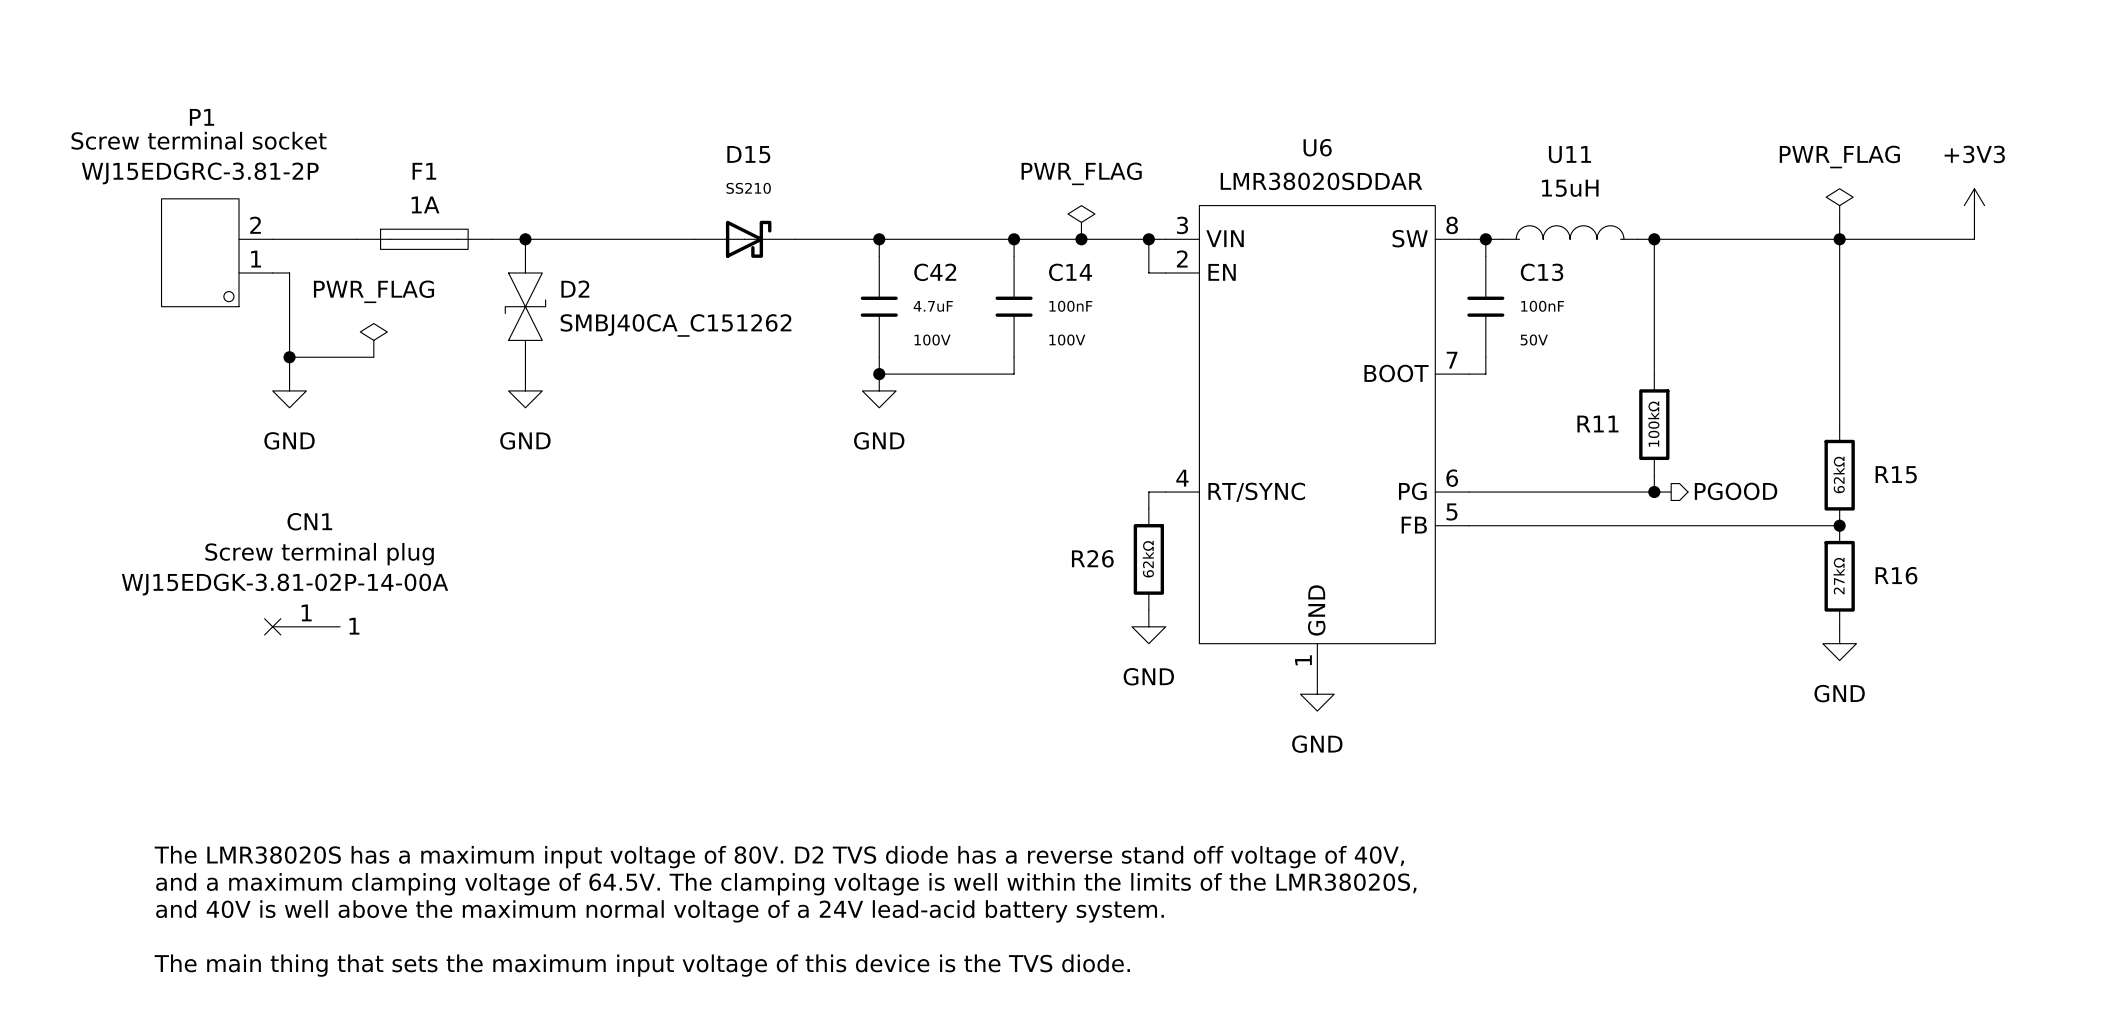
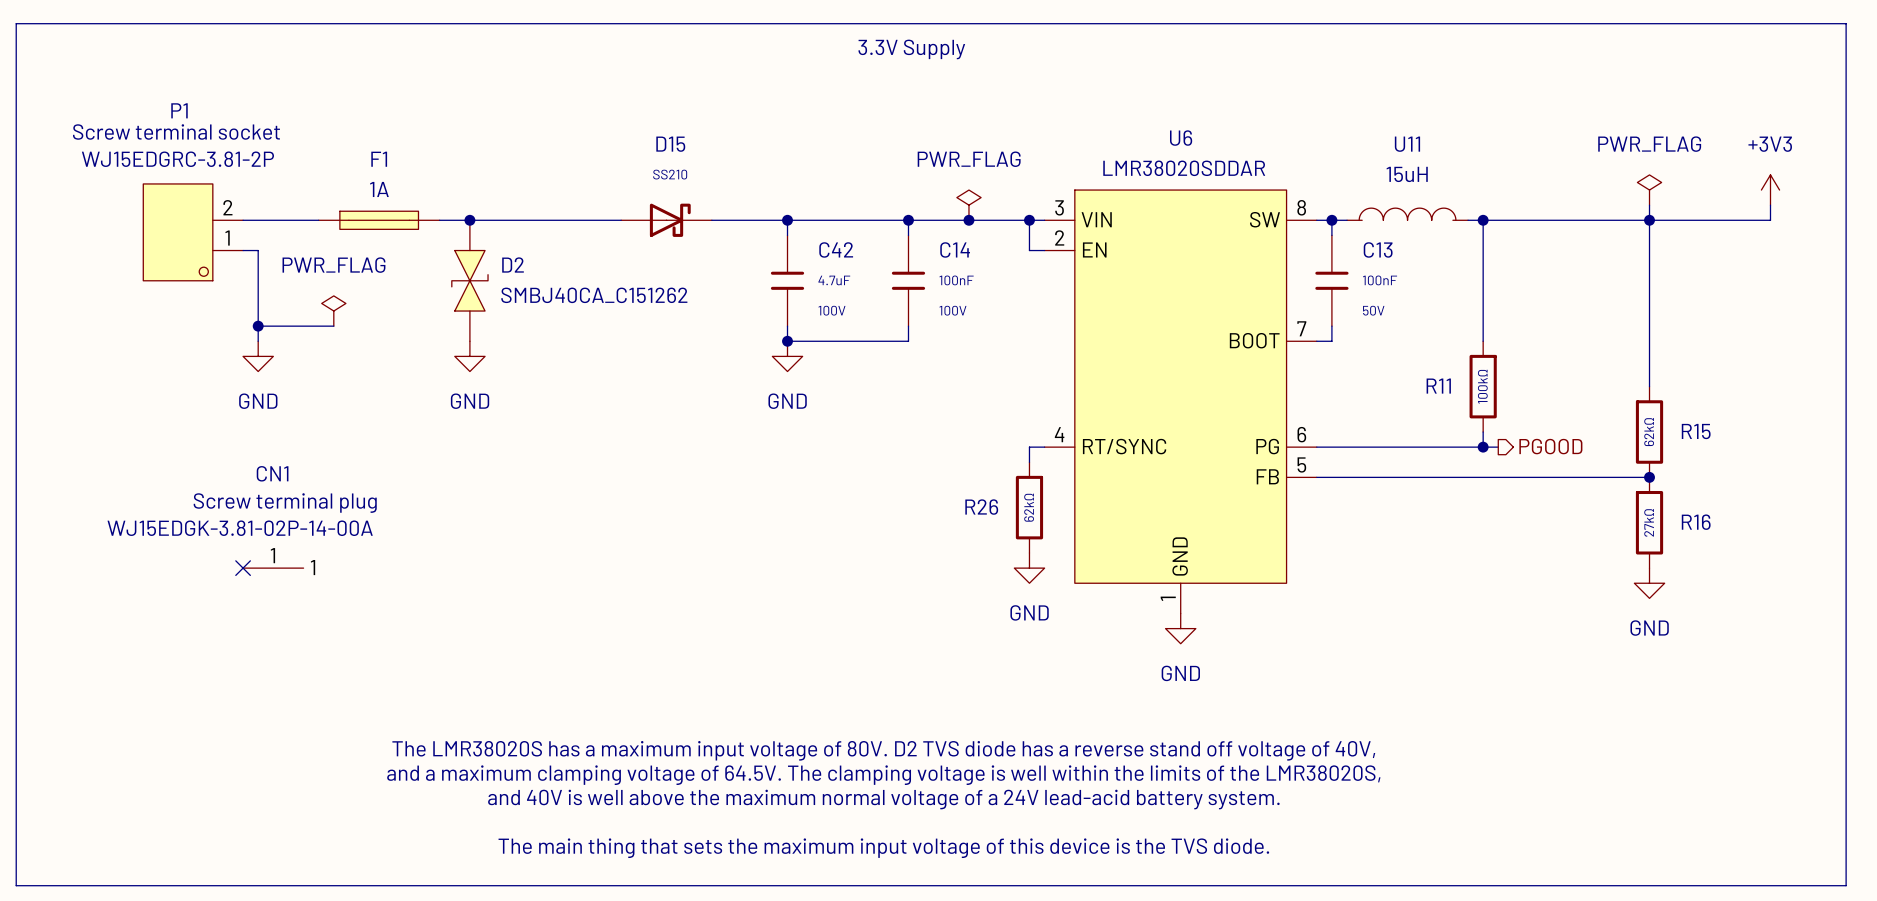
line: none -> (16, 23) (1846, 23) (1846, 885) (16, 885) (16, 23)
text: none -> 3.3V Supply (911, 49)
text: none -> The LMR38020S has a maximum input voltage of 80V. D2 TVS diode has a reverse stand off voltage of 40V, (883, 750)
text: The LMR38020S has a maximum input voltage of 80V. D2 TVS diode has a reverse stand off voltage of 40V, (779, 857) -> none
text: none -> and a maximum clamping voltage of 64.5V. The clamping voltage is well within the limits of the LMR38020S, (883, 775)
text: and a maximum clamping voltage of 64.5V. The clamping voltage is well within the limits of the LMR38020S, (786, 884) -> none
text: none -> and 40V is well above the maximum normal voltage of a 24V lead-acid battery system. (883, 799)
text: and 40V is well above the maximum normal voltage of a 24V lead-acid battery system. (660, 911) -> none
text: none -> The main thing that sets the maximum input voltage of this device is the TVS diode. (883, 848)
text: The main thing that sets the maximum input voltage of this device is the TVS diode. (642, 965) -> none

